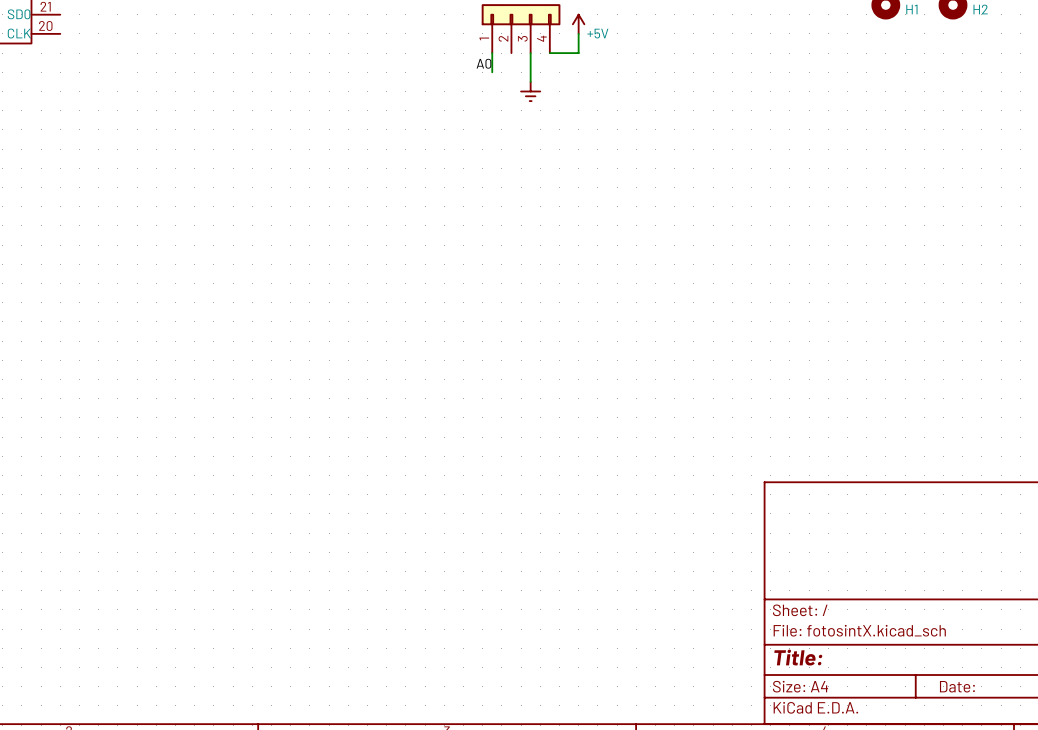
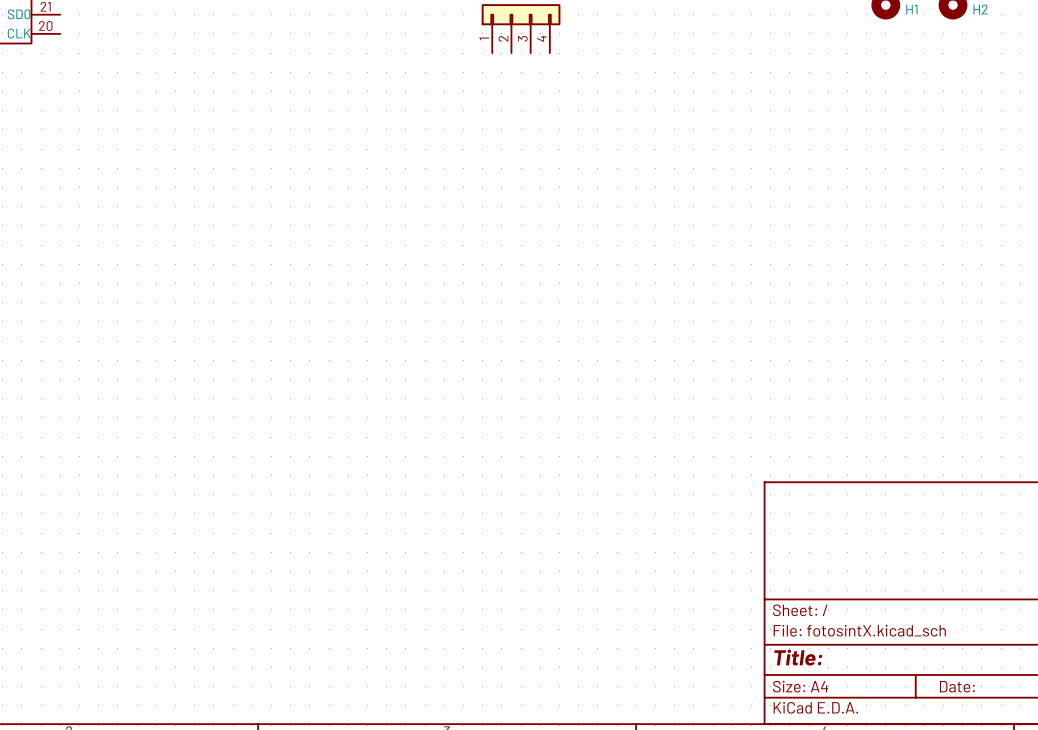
power symbol: +5V (578, 24) -> none
wire: (578, 33) (578, 53) (549, 53) -> none
wire: (492, 53) (492, 72) -> none
wire: (530, 53) (530, 81) -> none
label: A0 (483, 63) -> none
power symbol: (530, 91) -> none

